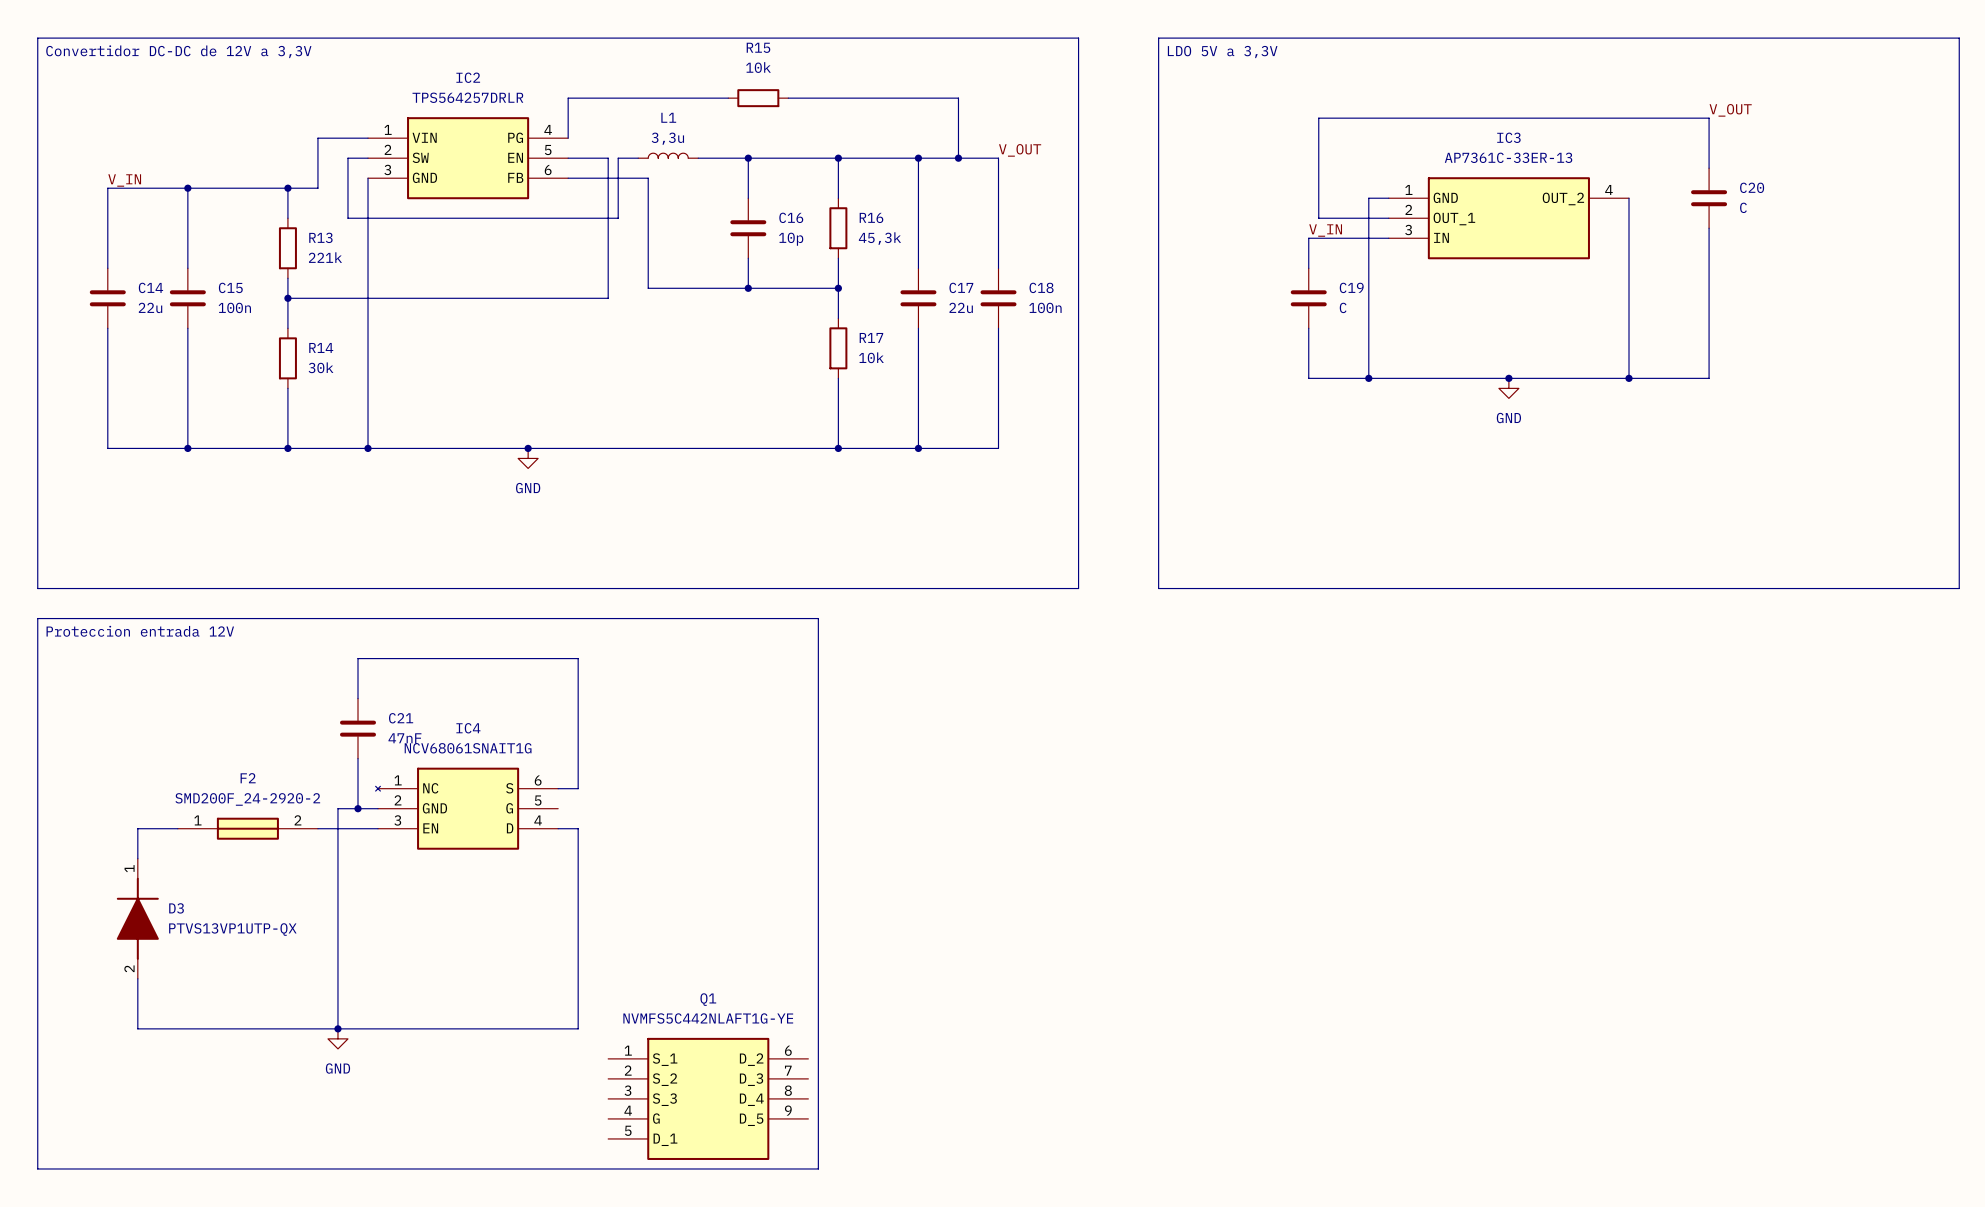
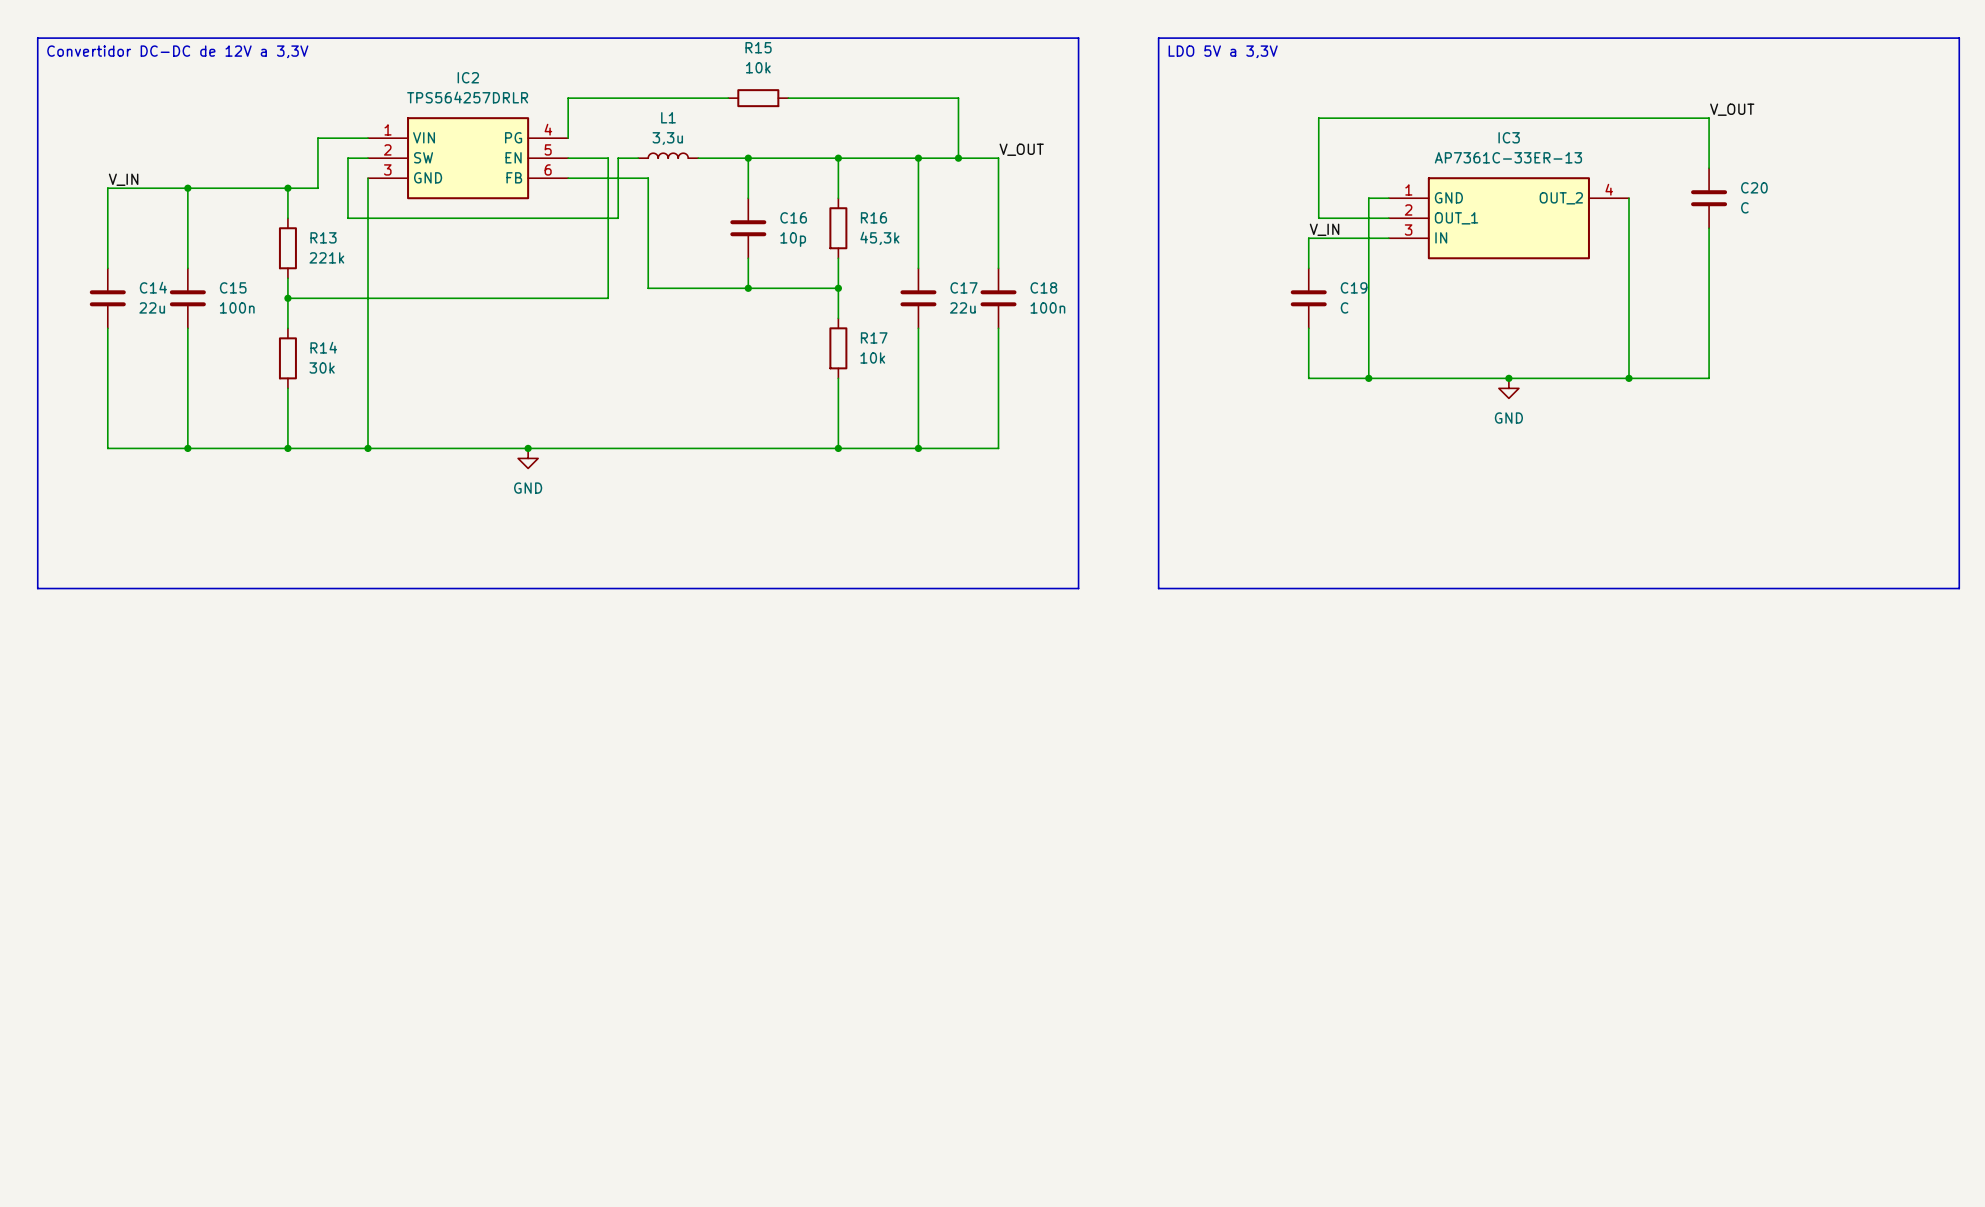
line: (37, 618) (818, 618) (818, 1168) (37, 1168) (37, 618) -> none
text: Proteccion entrada 12V (140, 631) -> none
wire: (358, 698) (358, 658) (578, 658) (578, 788) (558, 788) -> none
C21: 47nF (358, 728) -> none
wire: (358, 758) (358, 808) -> none
junction: (358, 808) -> none
wire: (378, 808) (337, 808) (337, 1028) -> none
IC4: NCV68061SNAIT1G (466, 808) -> none
wire: (177, 828) (137, 828) (137, 858) -> none
F2: SMD200F_24-2920-2 (247, 828) -> none
wire: (317, 828) (378, 828) -> none
wire: (558, 828) (578, 828) (578, 1028) (137, 1028) (137, 978) -> none
D3: PTVS13VP1UTP-QX (137, 918) -> none
junction: (337, 1028) -> none
power symbol: GND (337, 1038) -> none
Q1: NVMFS5C442NLAFT1G-YE (708, 1098) -> none

